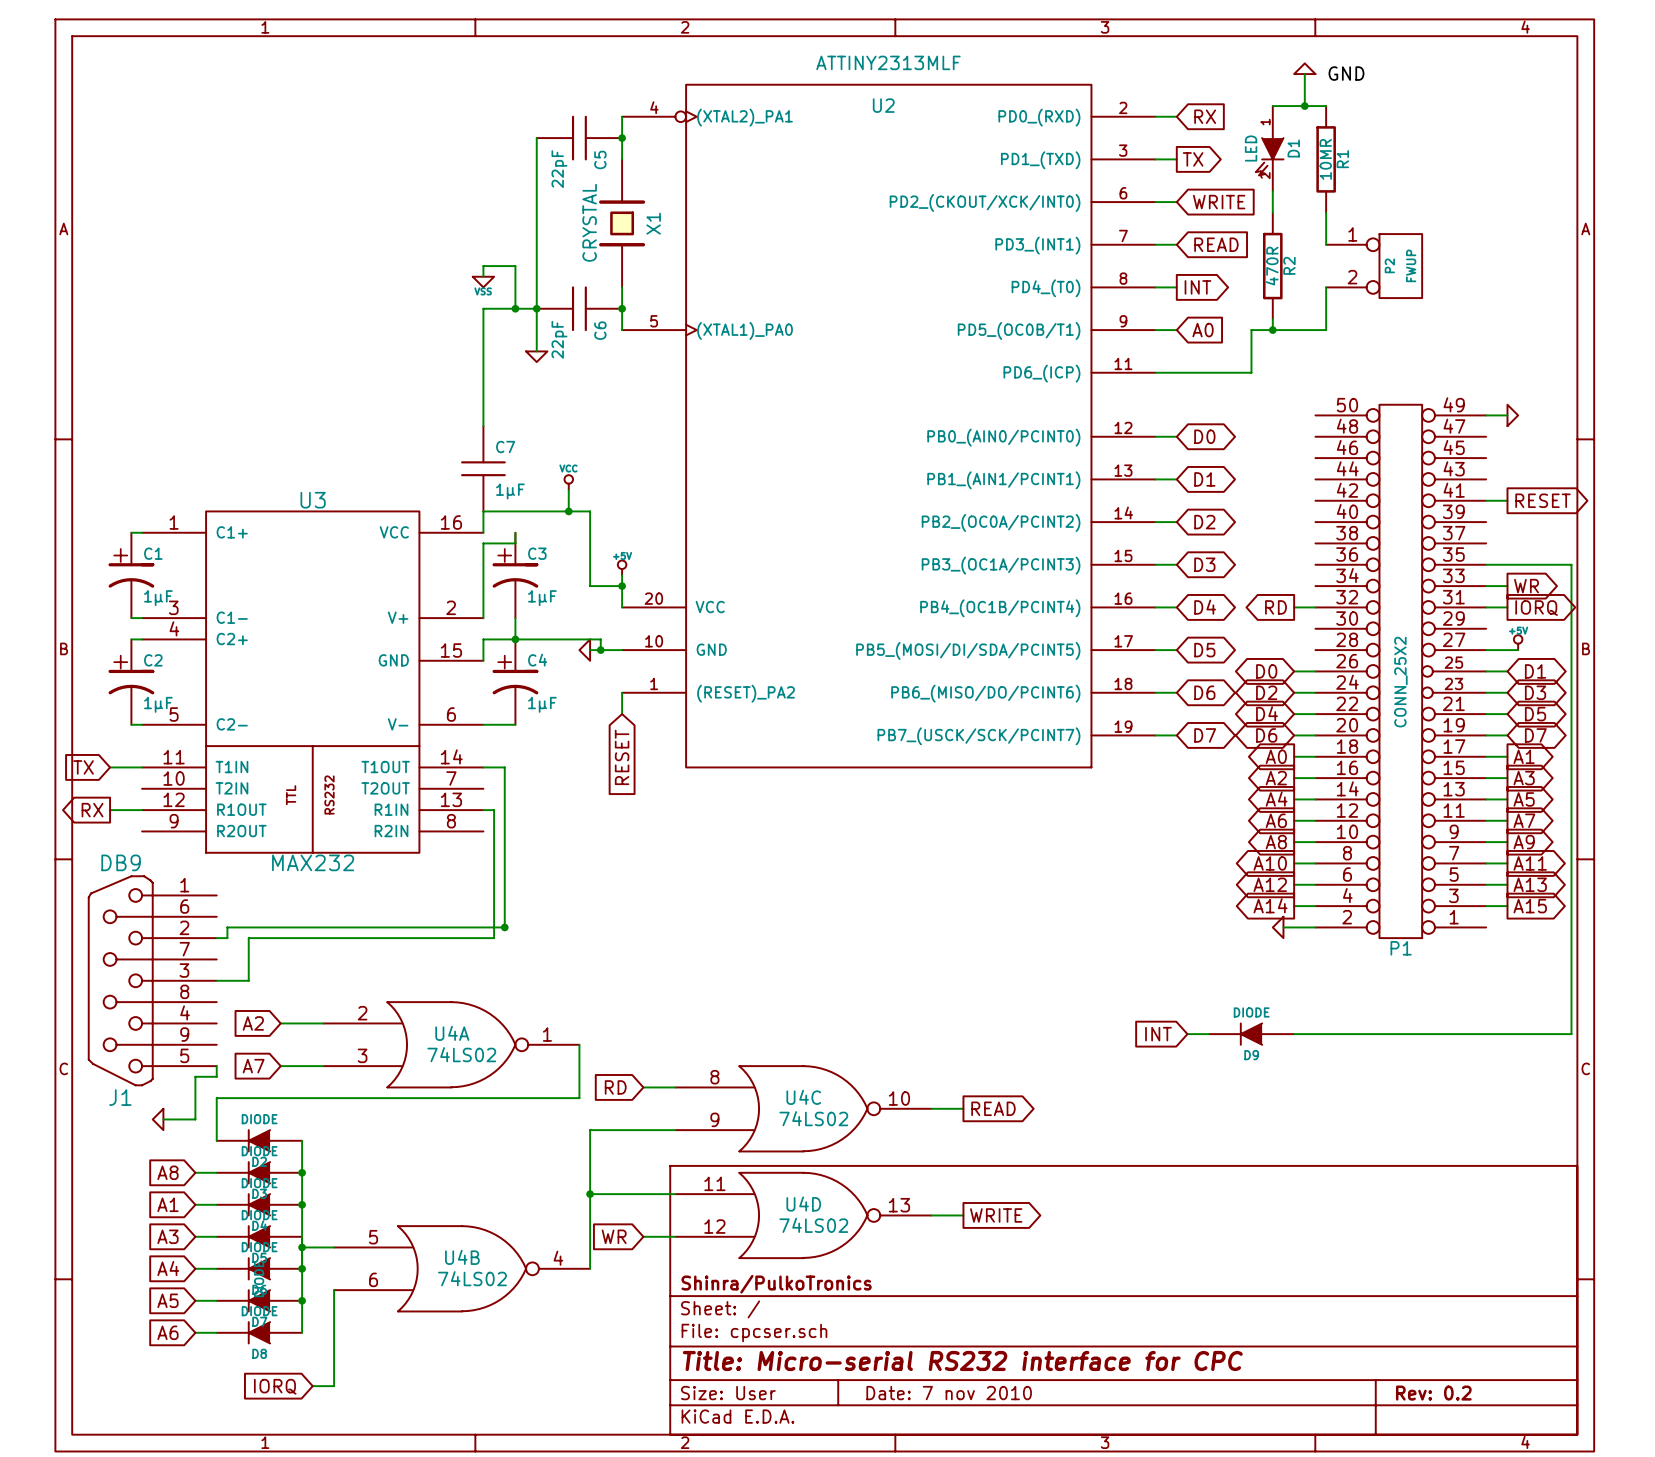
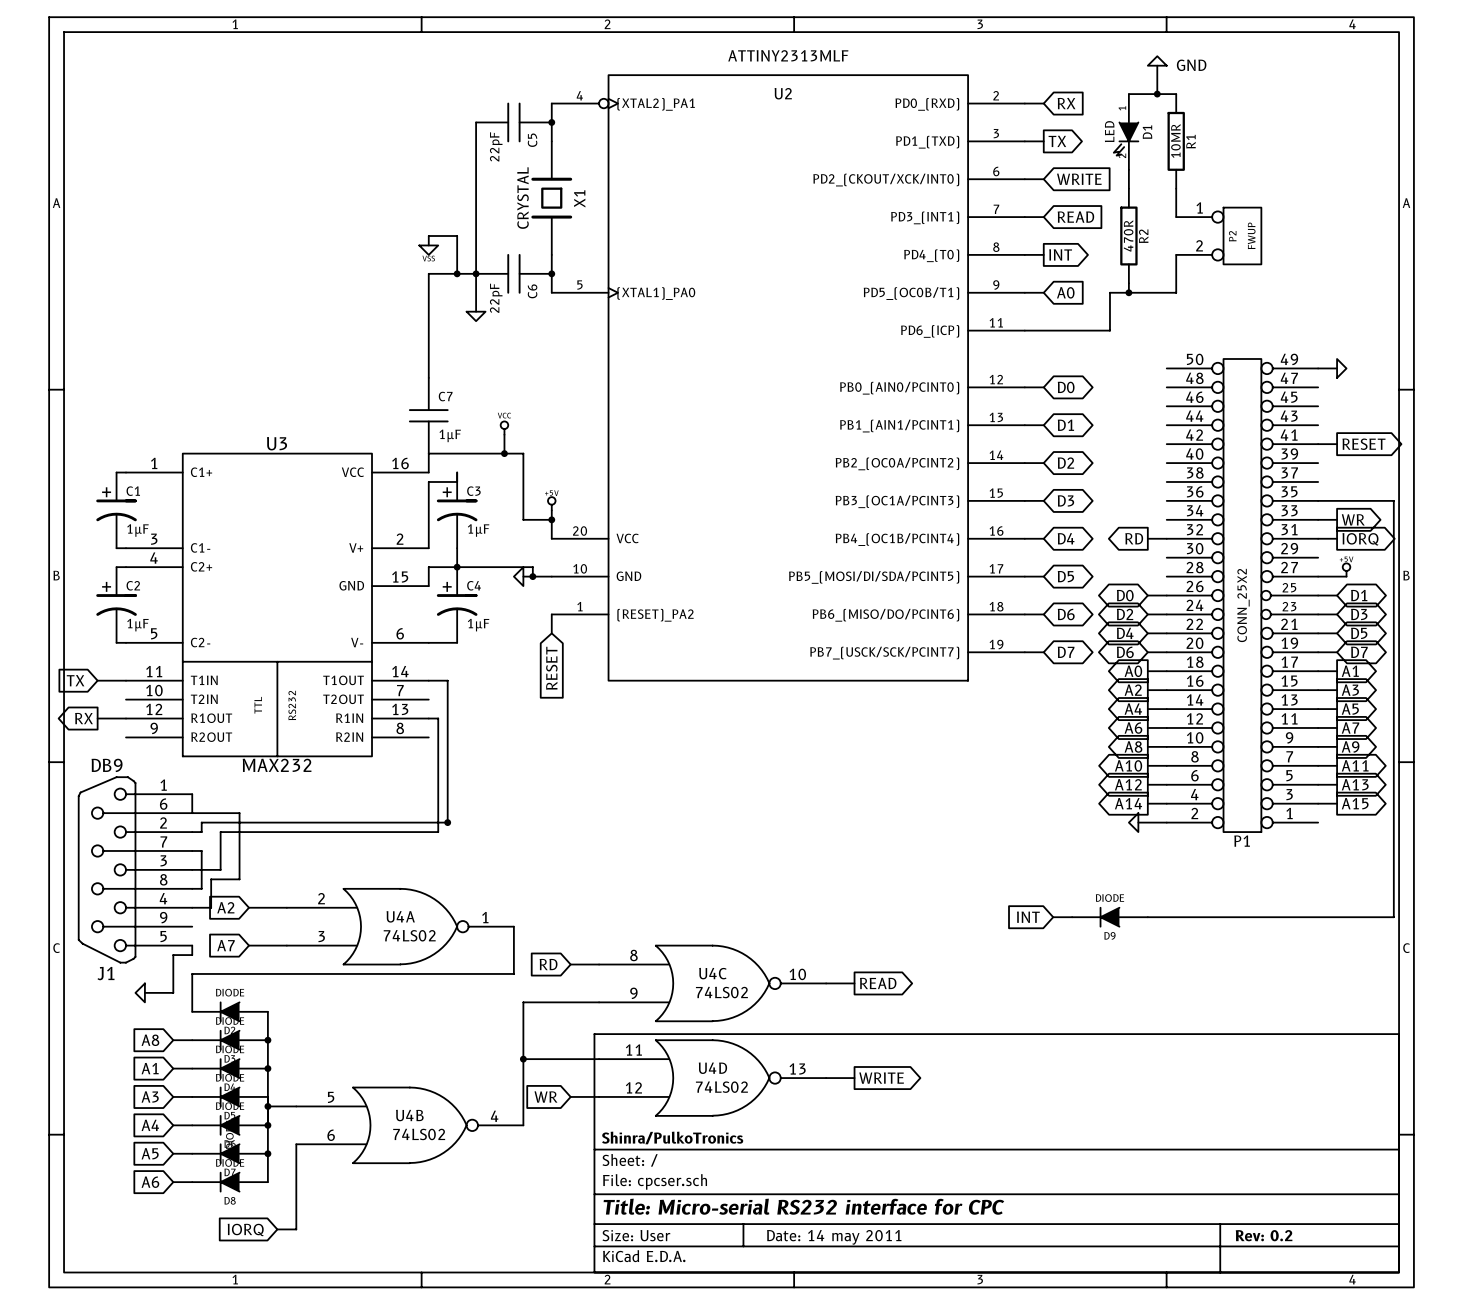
wire: none -> (192, 794) (192, 813) (239, 813) (239, 879) (211, 879) (211, 907) (192, 907)
wire: none -> (192, 850) (201, 850) (201, 888) (192, 888)
title block: Date: 7 nov 2010 (949, 1393) -> Date: 14 may 2011 (834, 1237)

